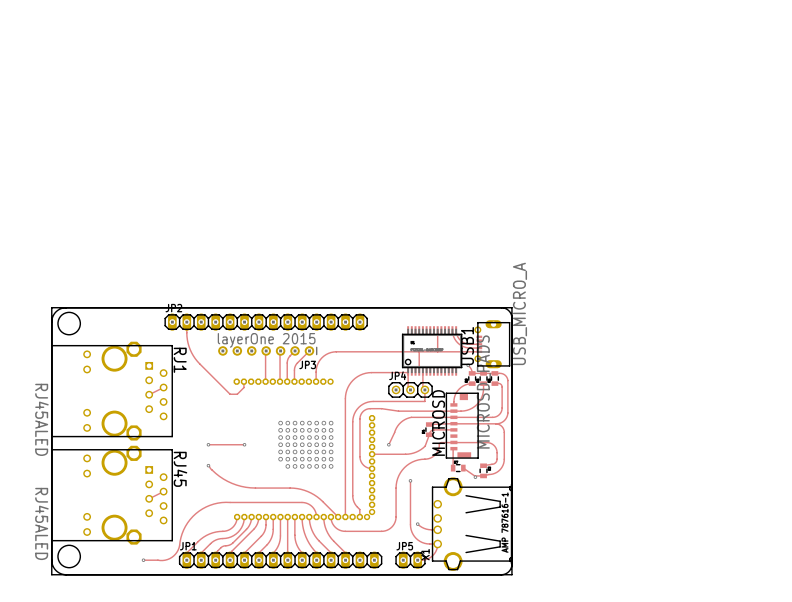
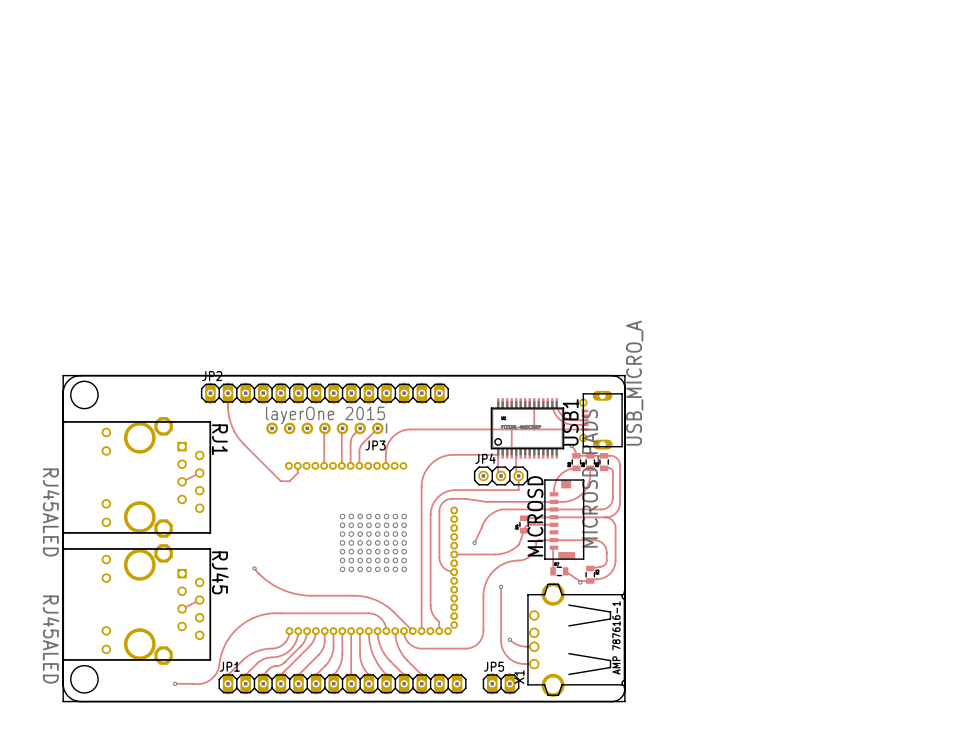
track: (208, 444) (244, 444) -> none
via: (208, 444) -> none
via: (244, 444) -> none
via: none -> (342, 569)
track: (437, 544) (435, 552) (431, 556) (417, 560) -> none

